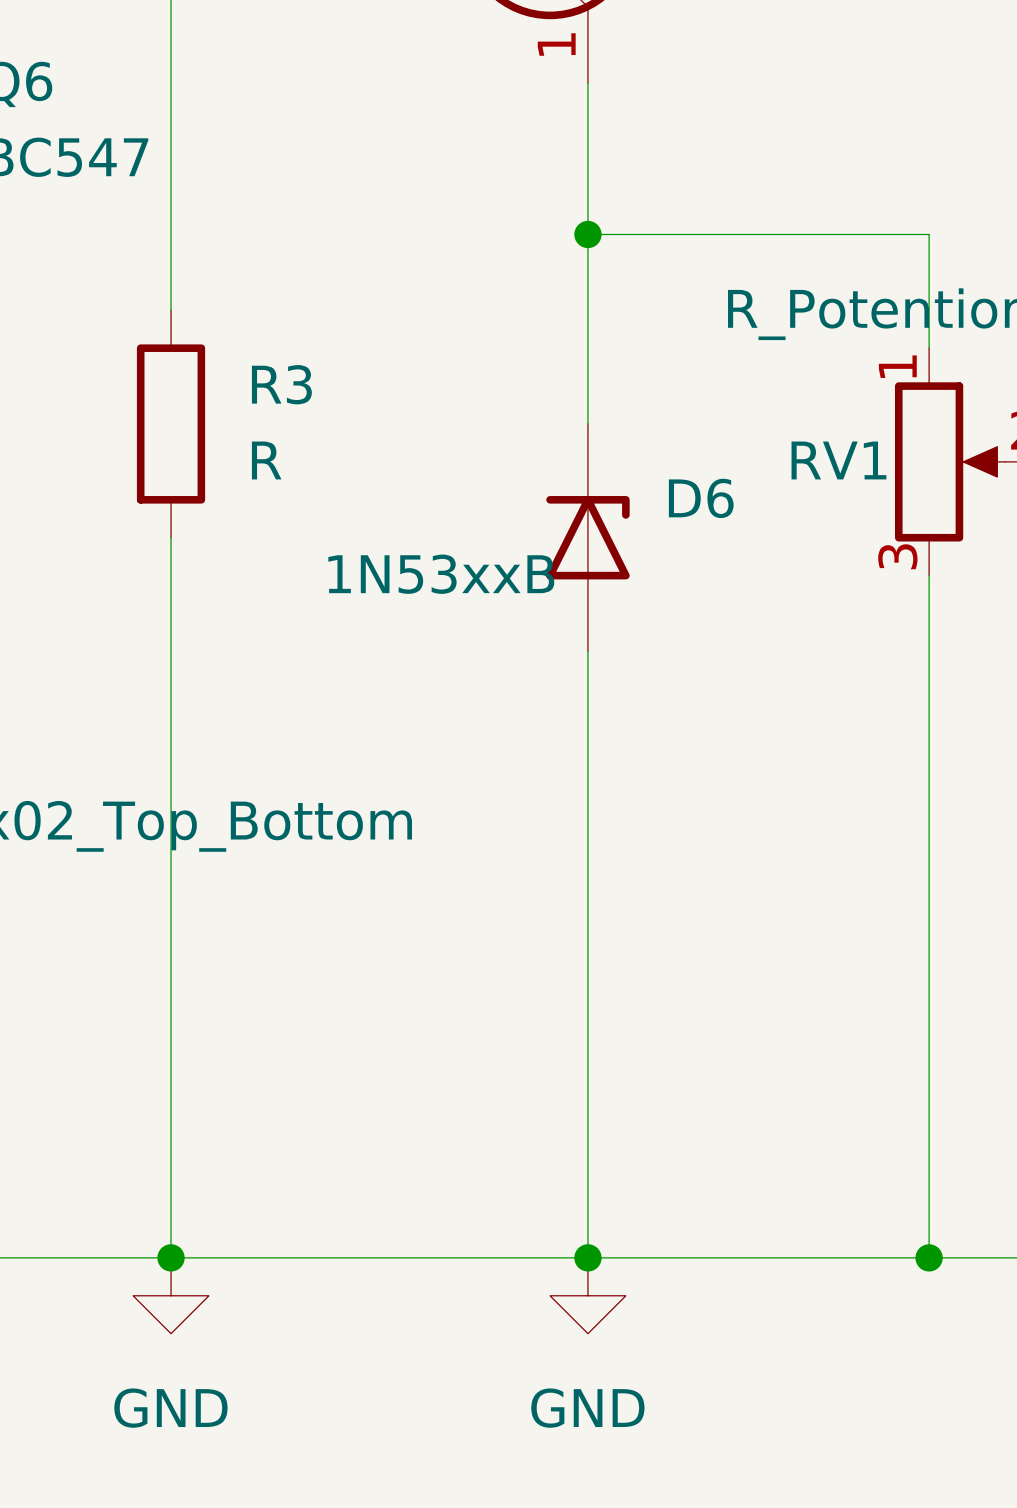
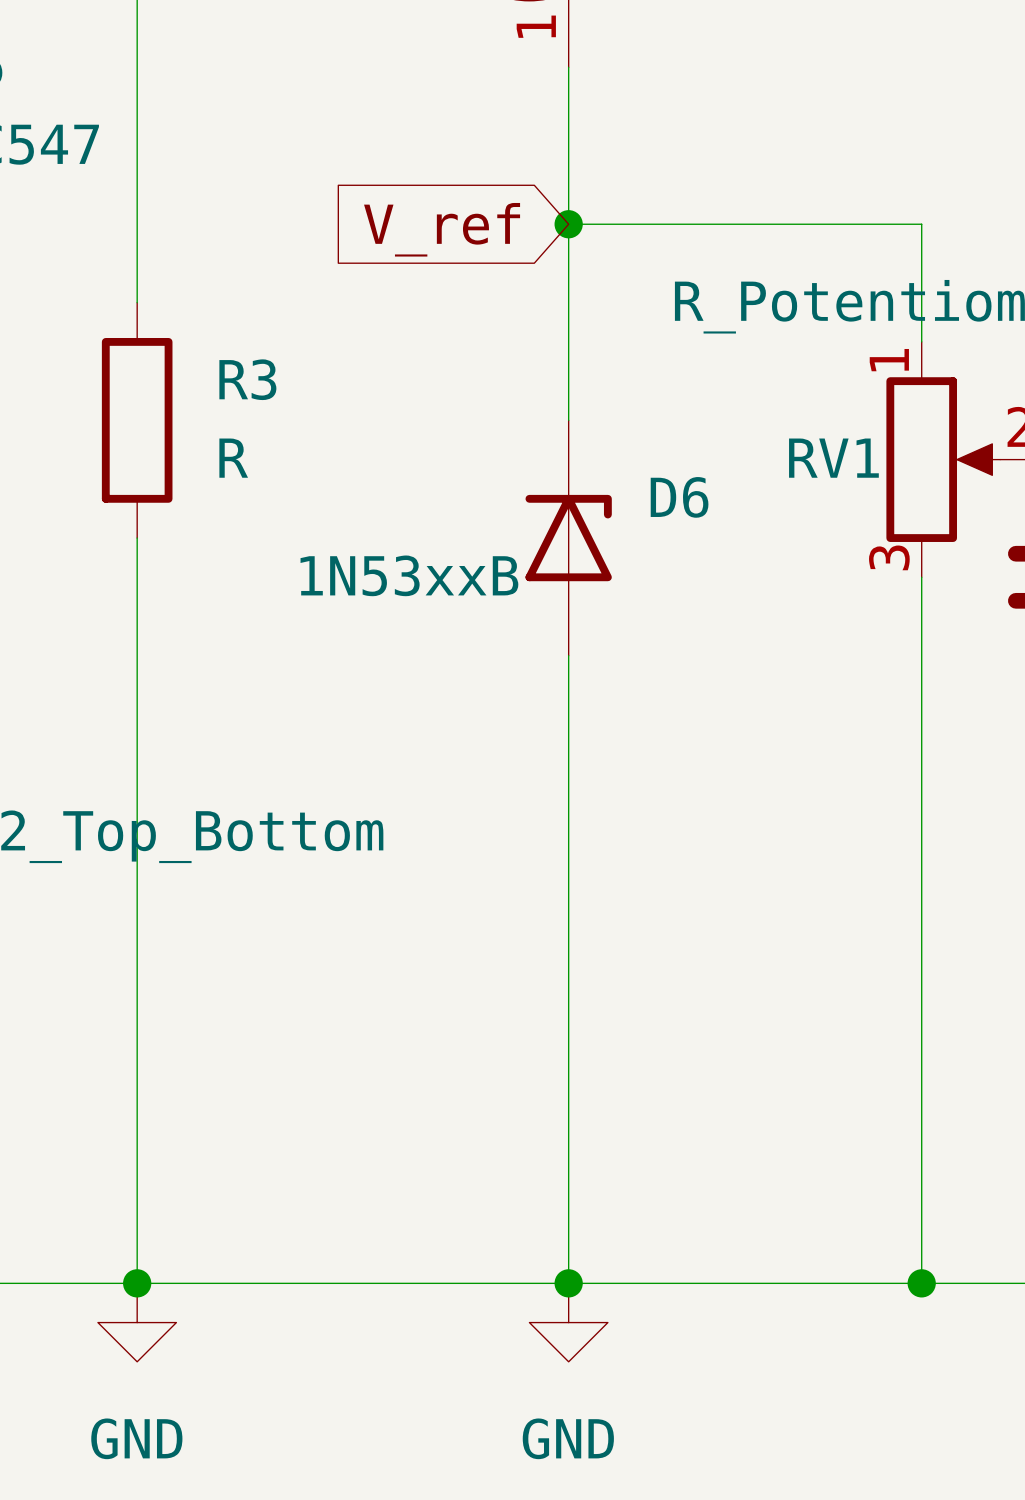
global label: none -> V_ref (442, 229)

